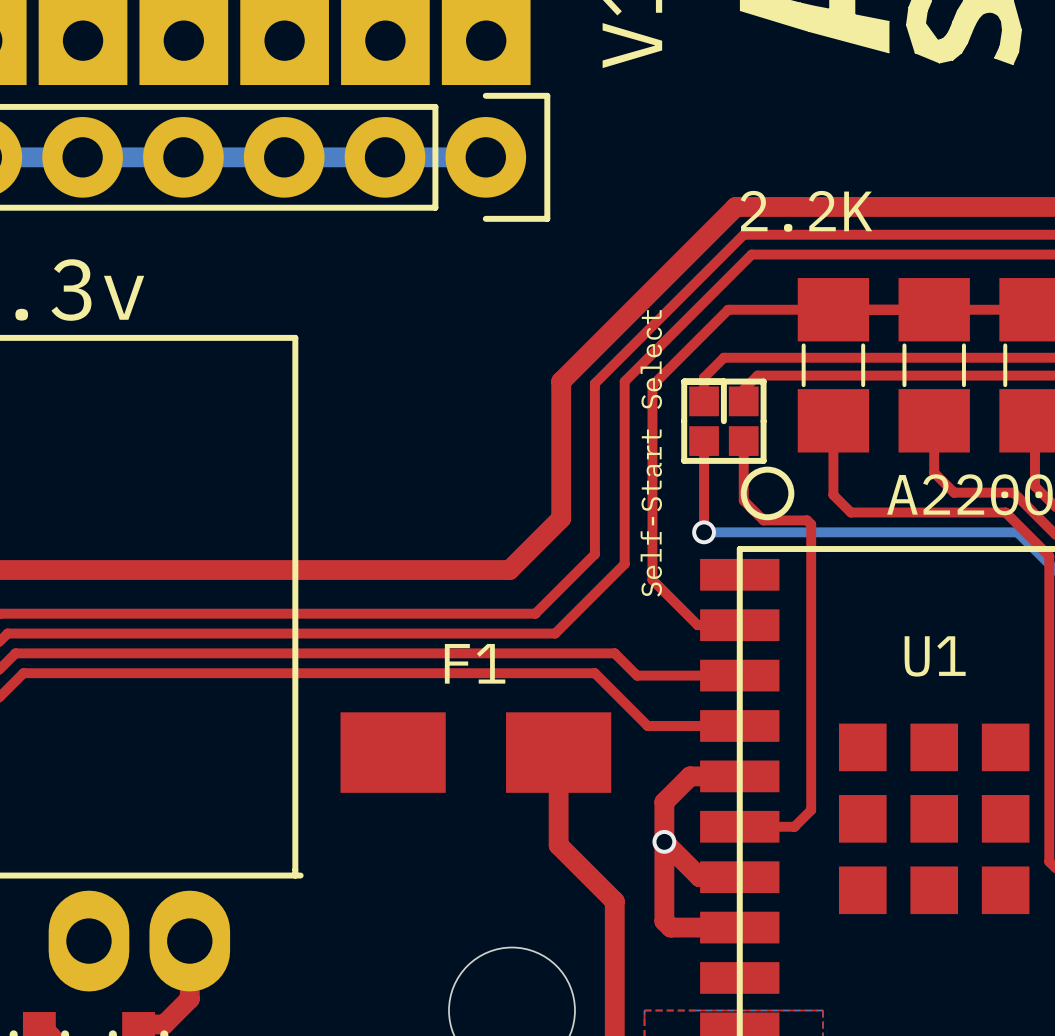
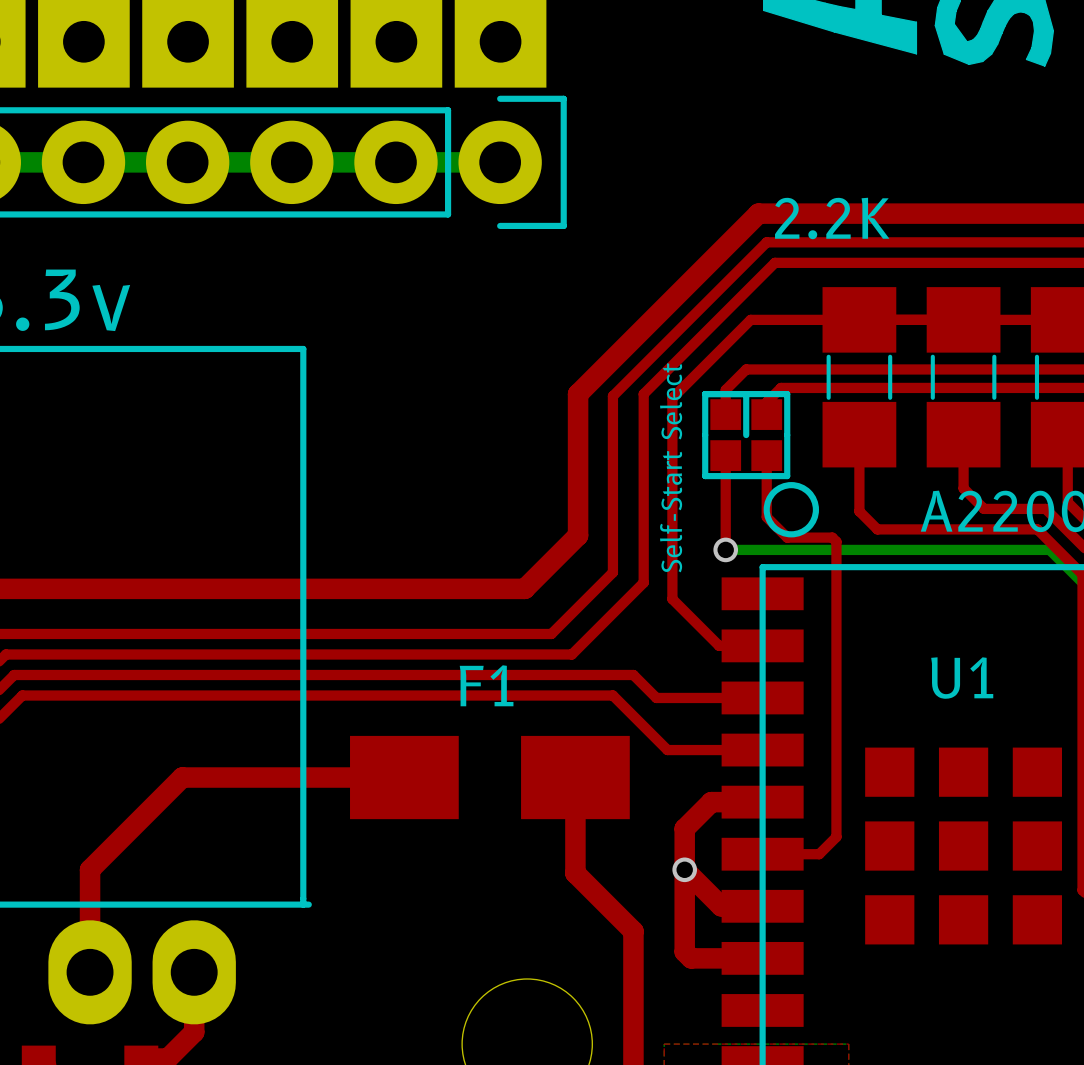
top track: none -> (404, 777) (182, 777) (90, 869) (90, 972)

